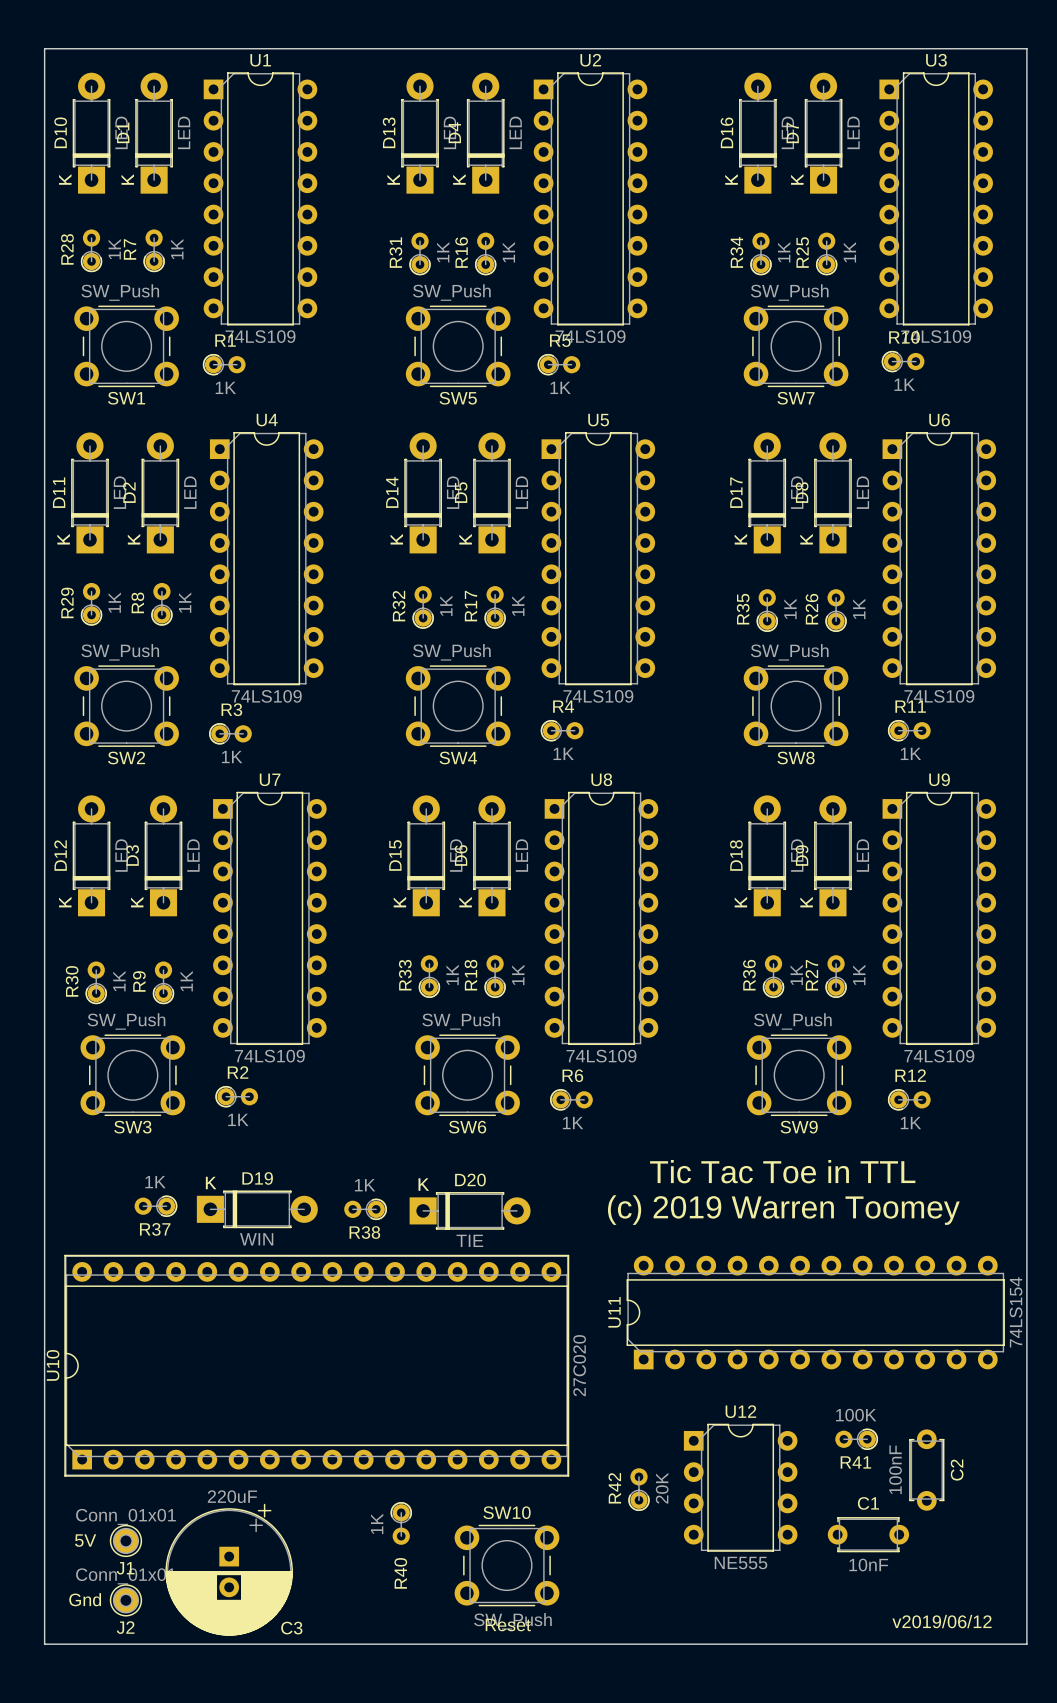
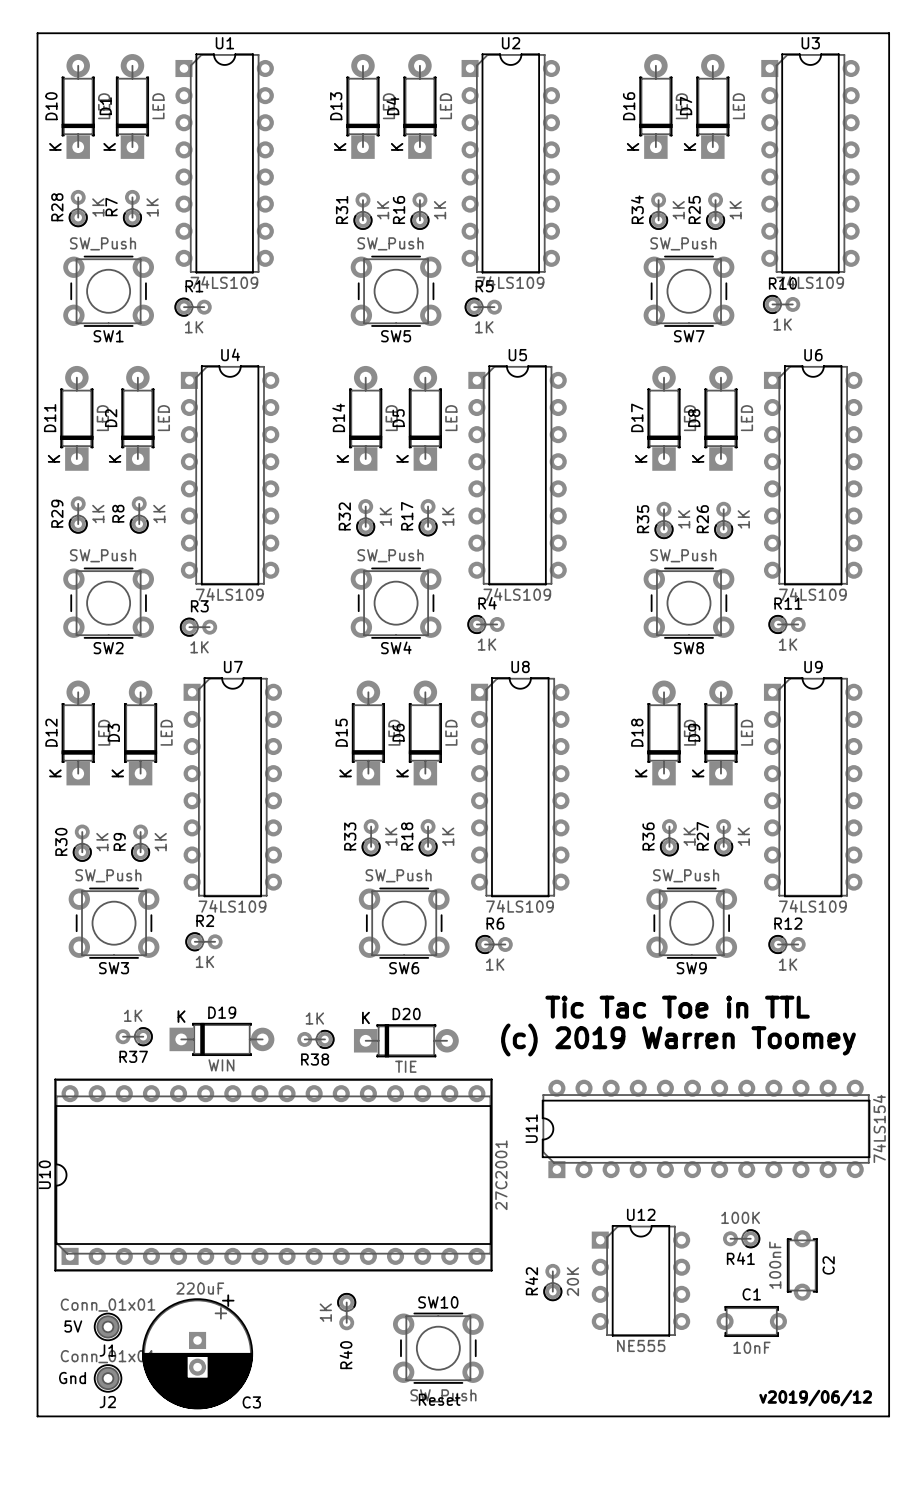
U10 value: 27C020 (579, 1365) -> 27C2001 (501, 1175)

